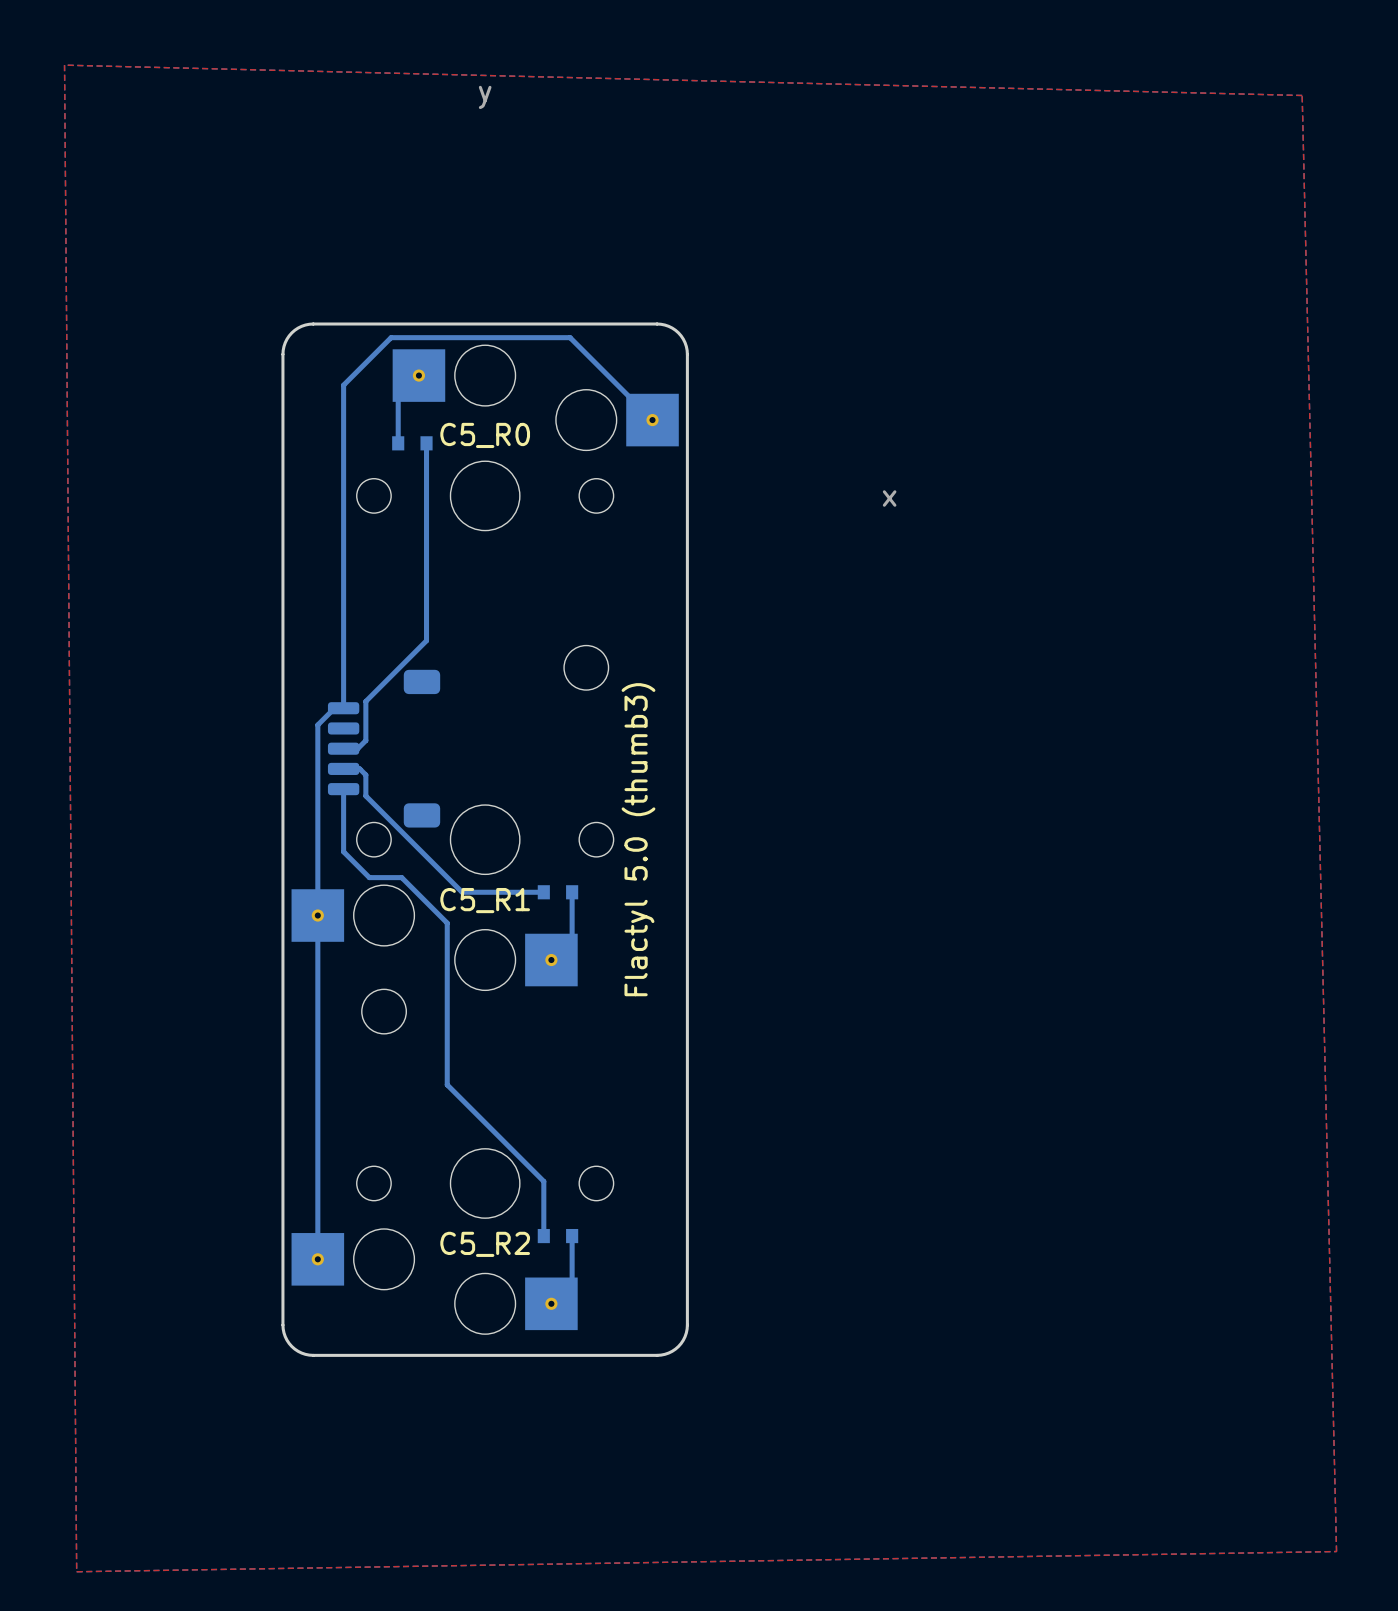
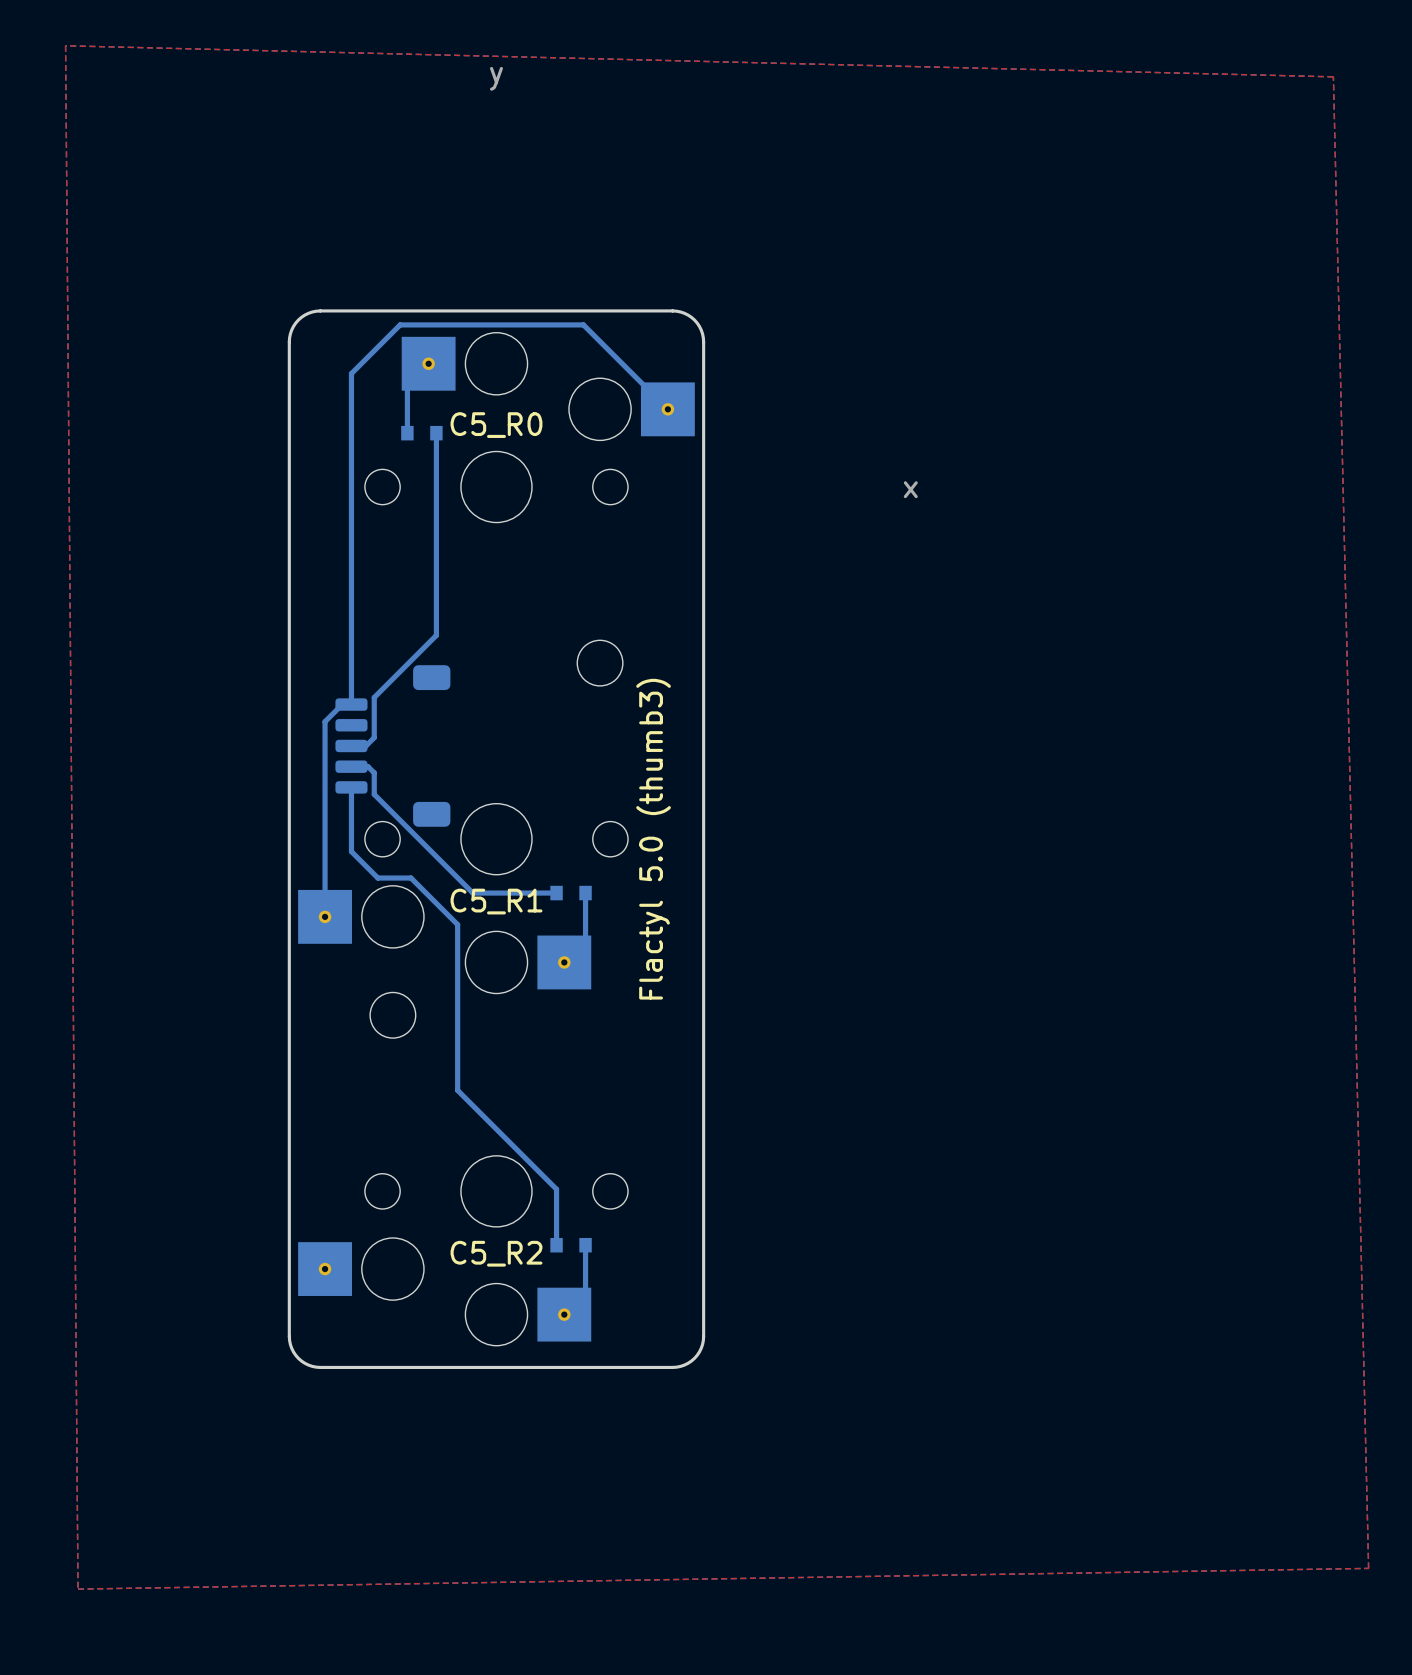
bottom track: (317, 915) (317, 1259) -> none

